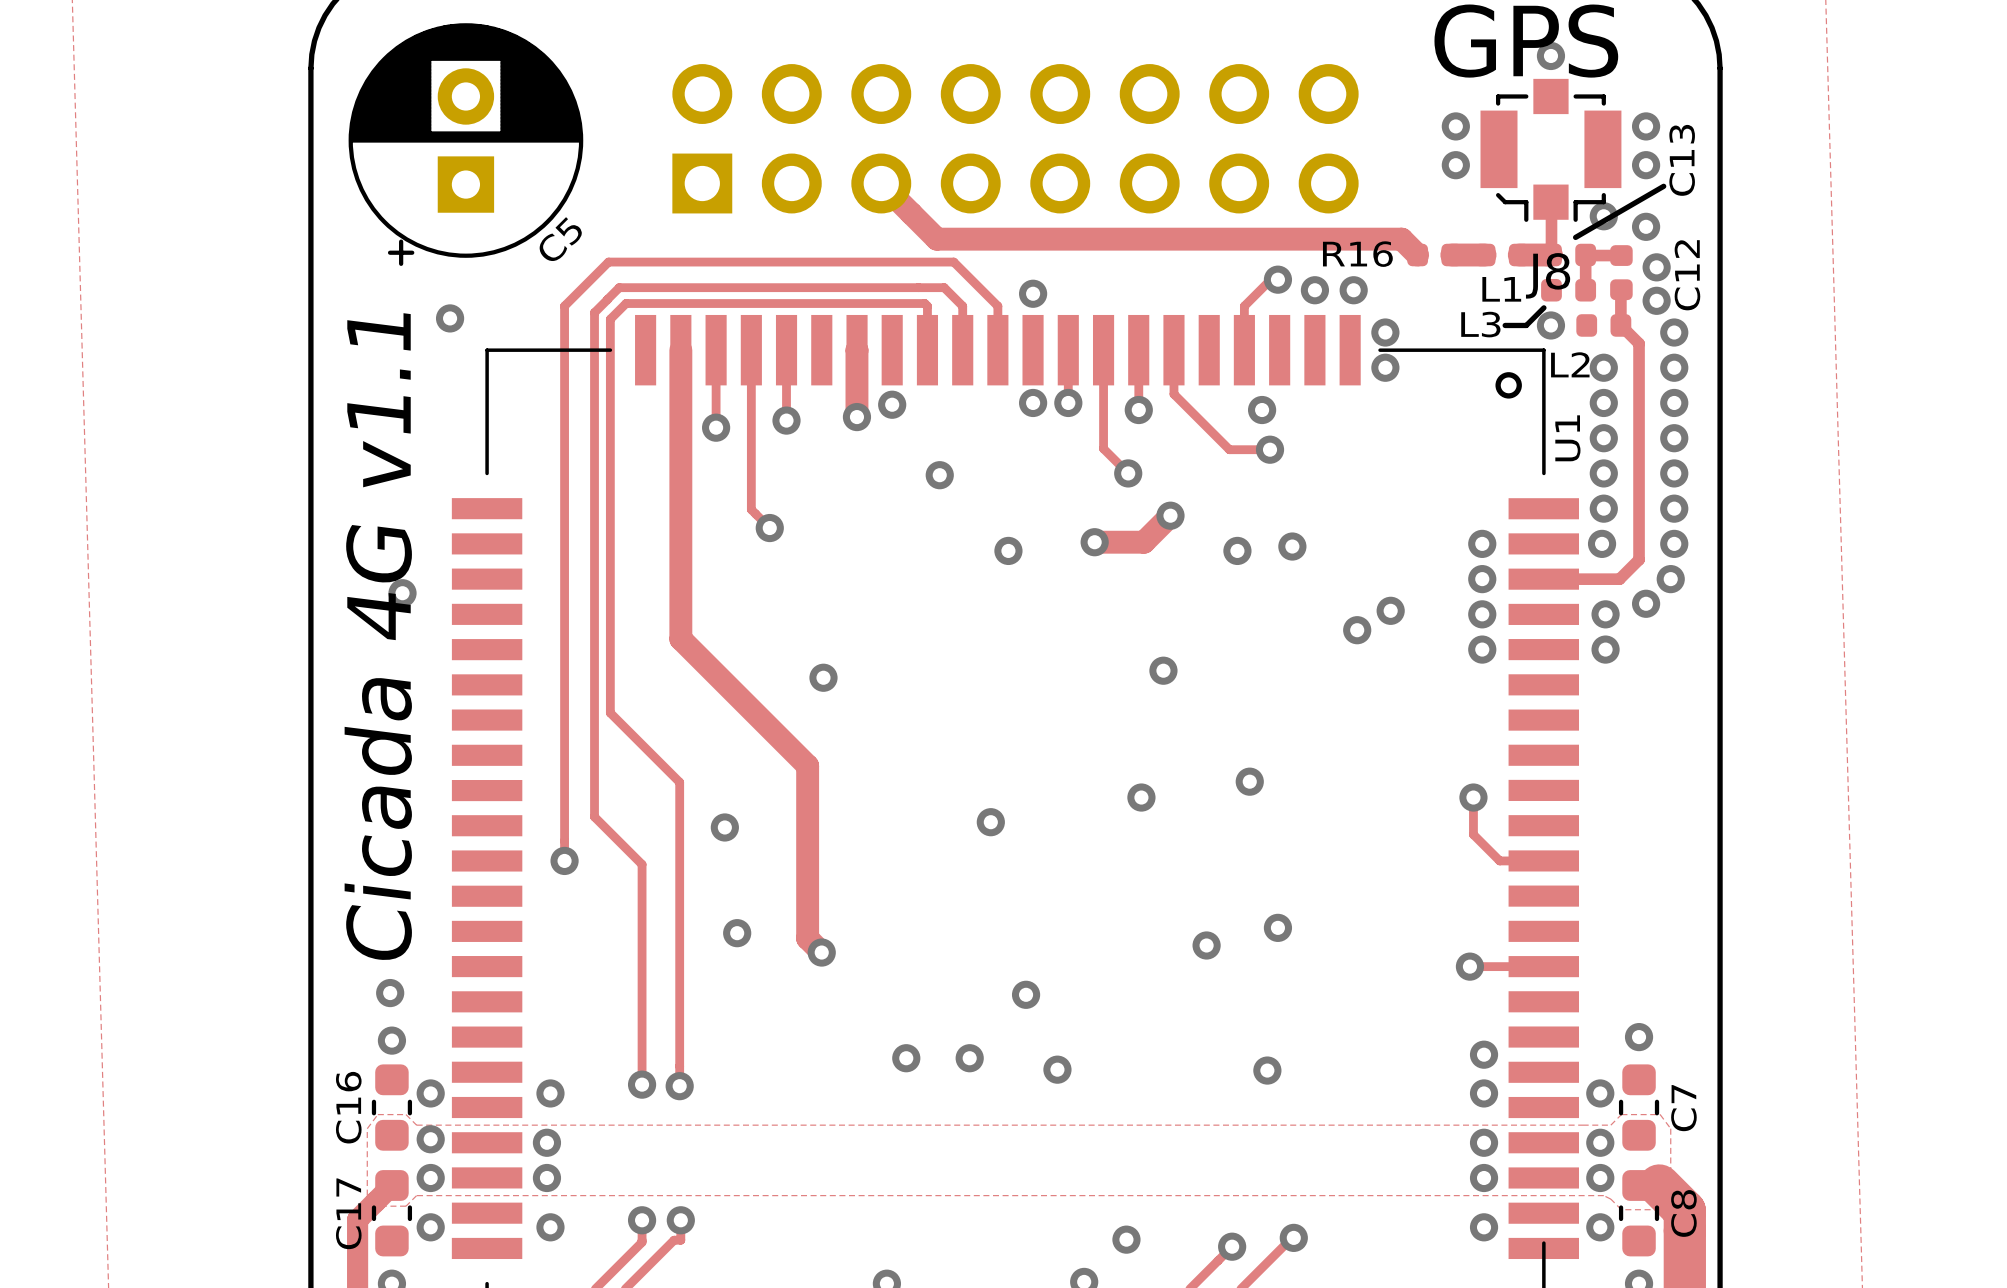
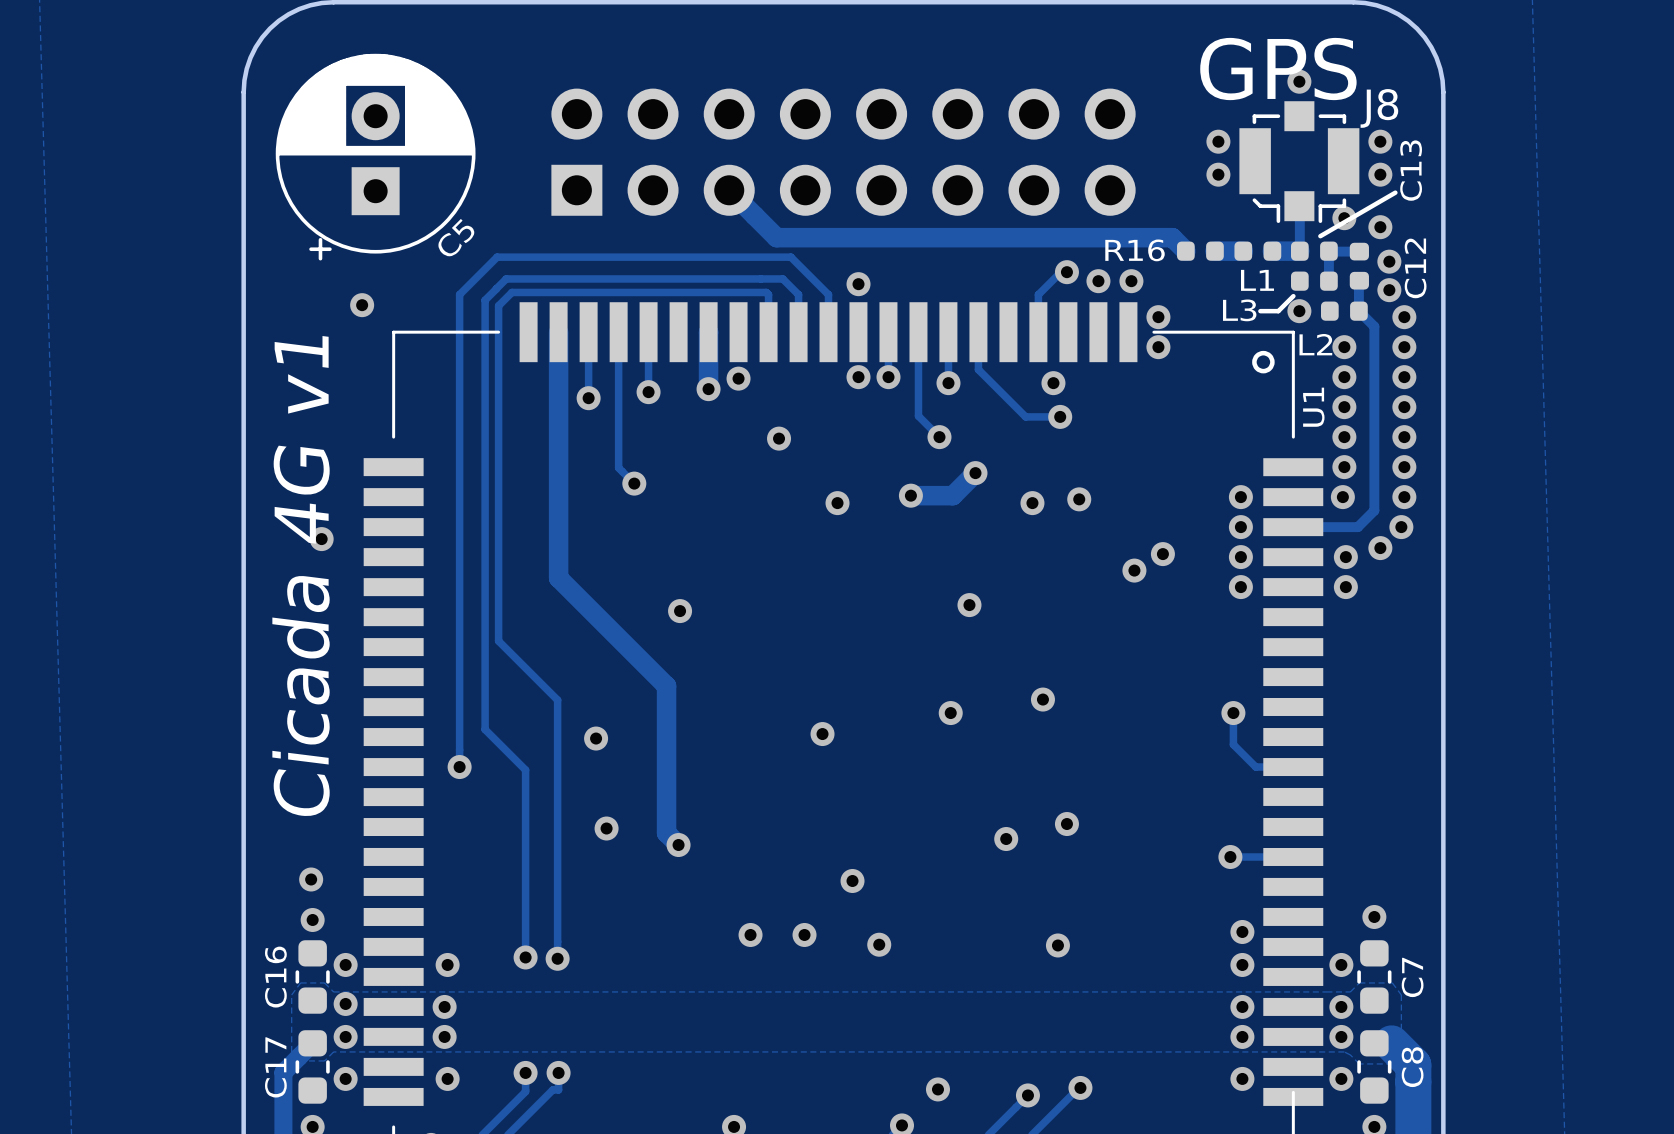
J8 name position: J8 (1548, 275) -> J8 (1379, 108)
text: Cicada 4G v1.1 (378, 637) -> Cicada 4G v1 (301, 576)

